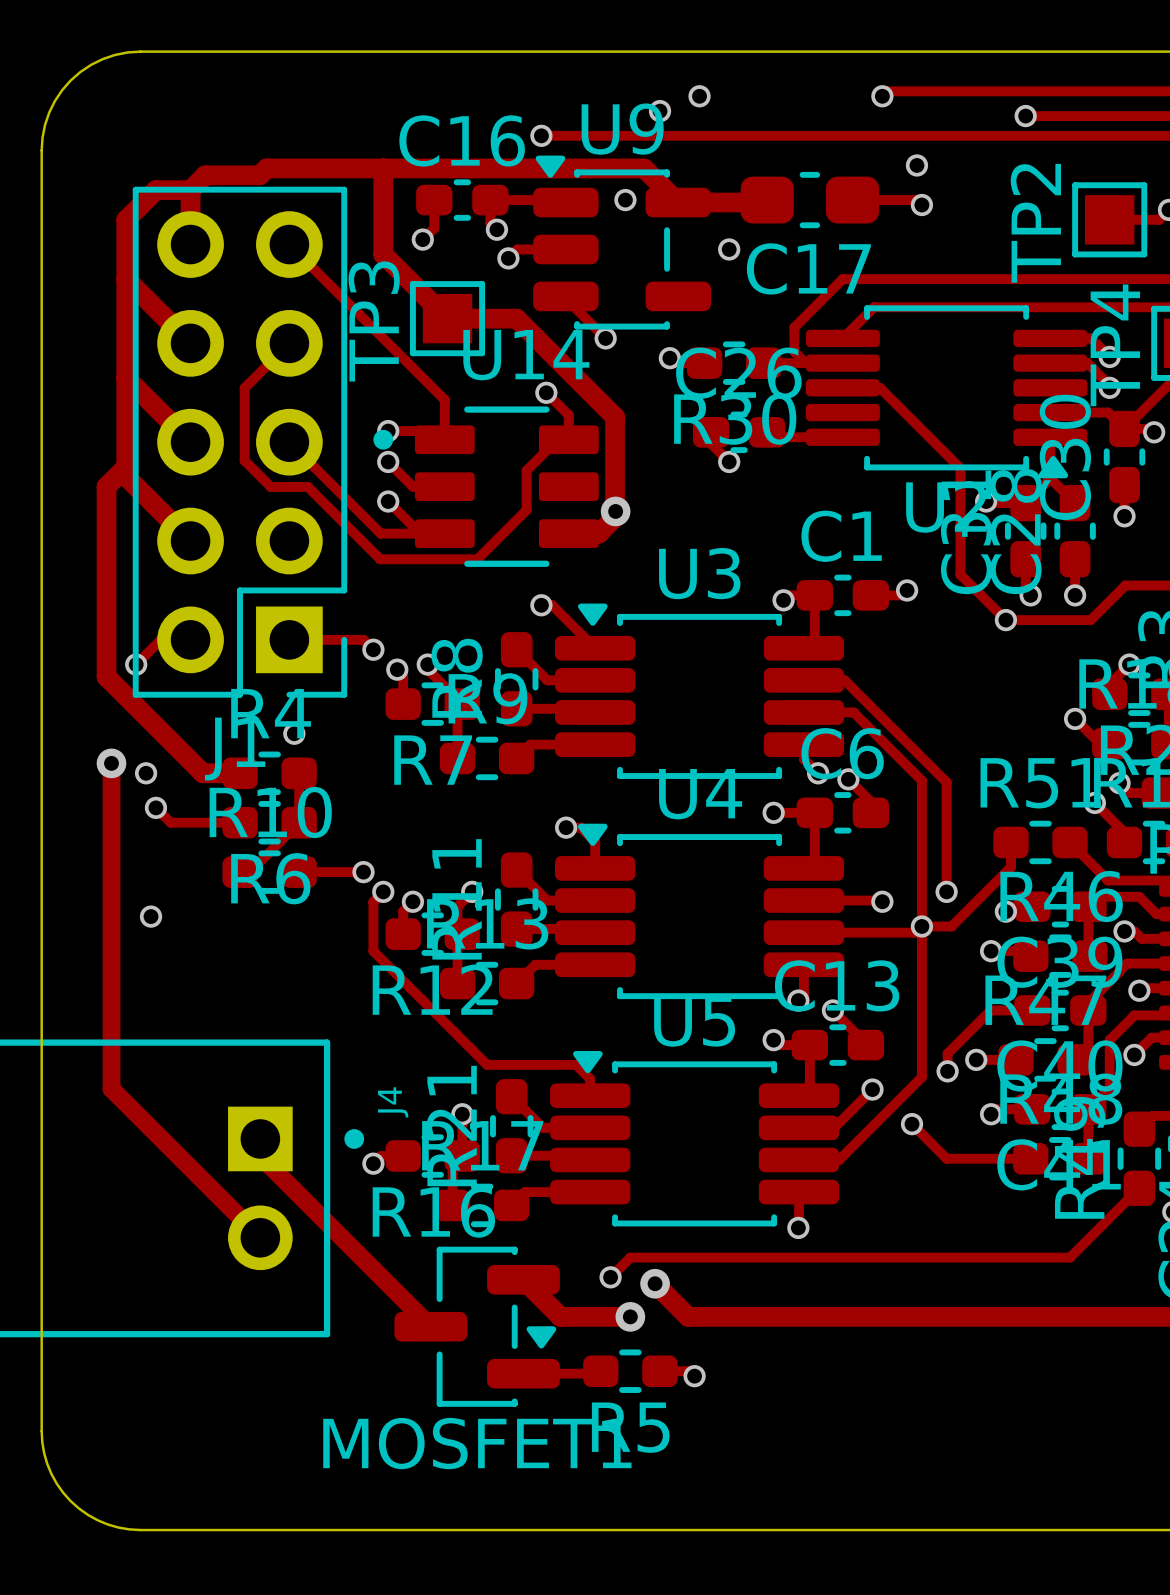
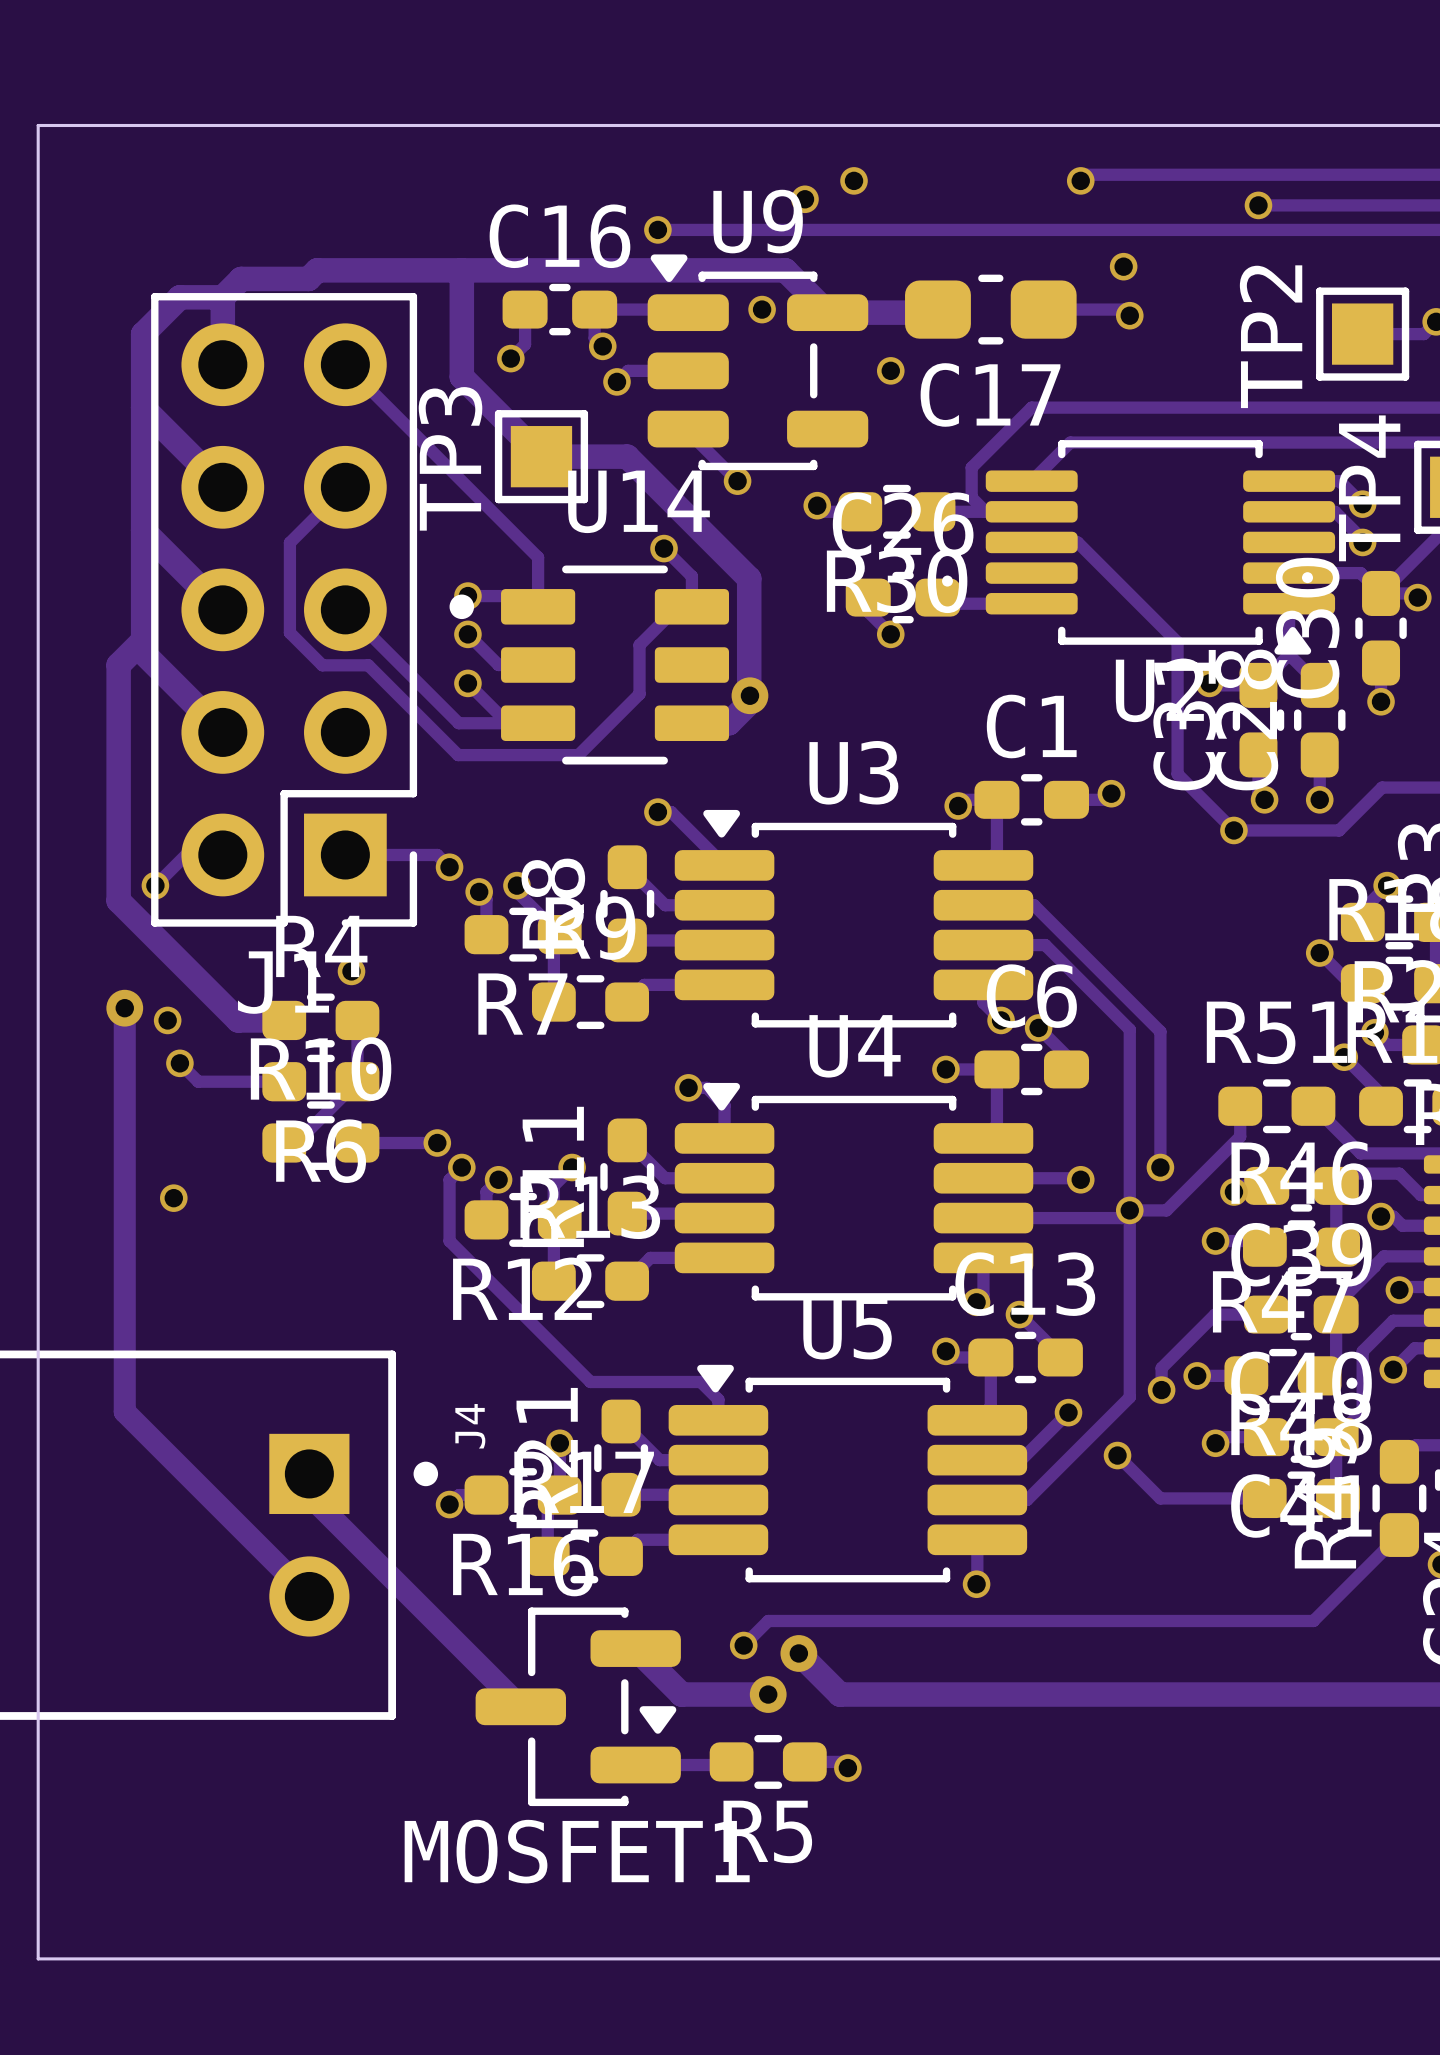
board edge: (140, 51) (114, 54) (102, 59) (91, 64) (70, 80) (54, 101) (49, 112) (45, 124) (41, 150) -> (160, 125) (38, 125) (38, 248)
board edge: (41, 1431) (44, 1453) (51, 1474) (70, 1501) (97, 1520) (118, 1527) (140, 1530) -> (38, 1836) (38, 1958) (160, 1958)

